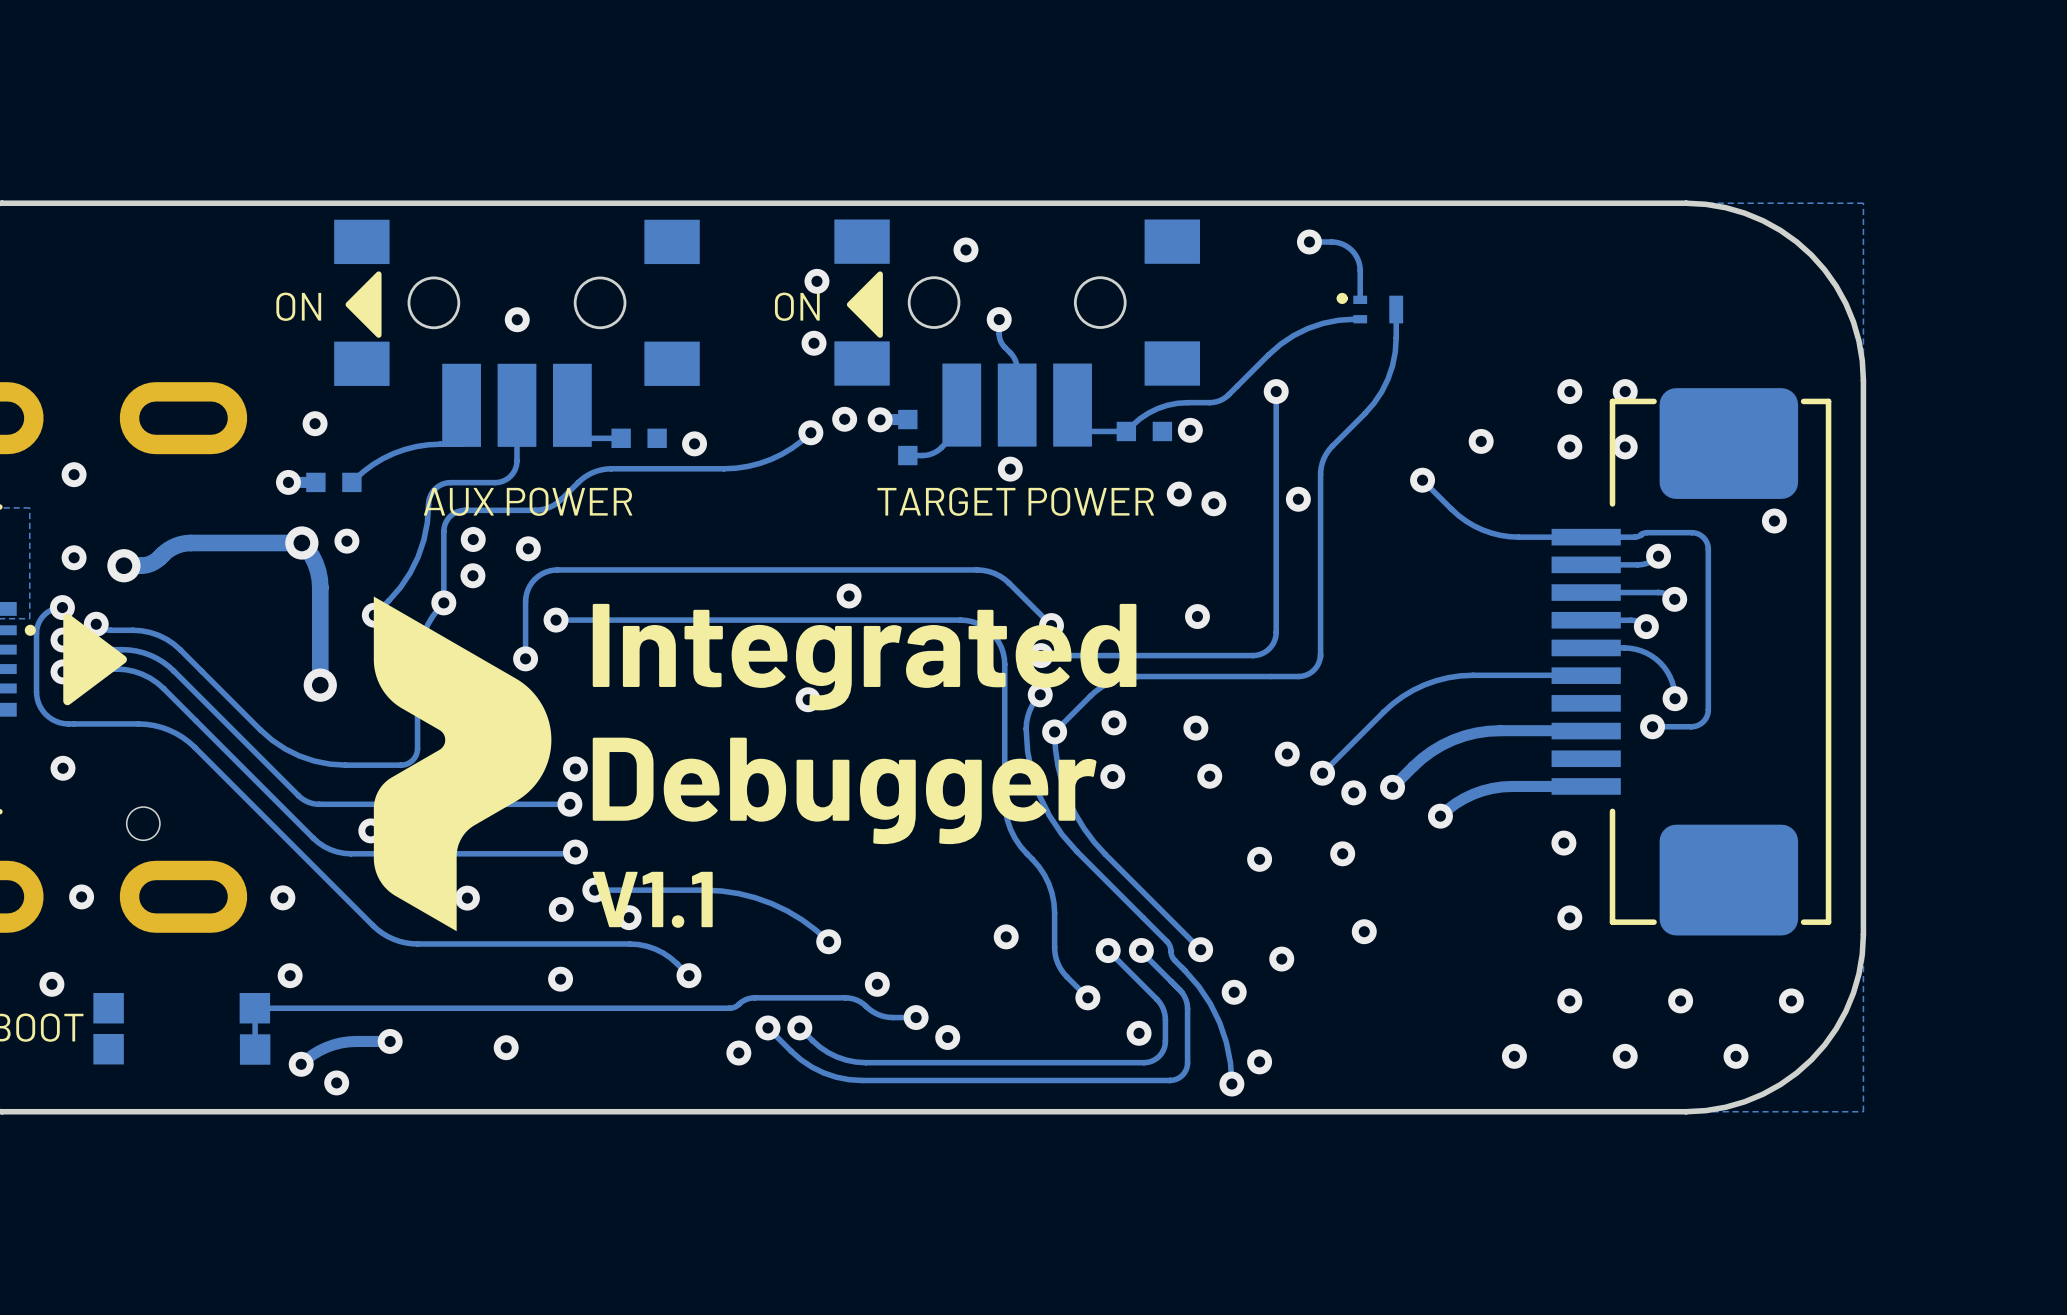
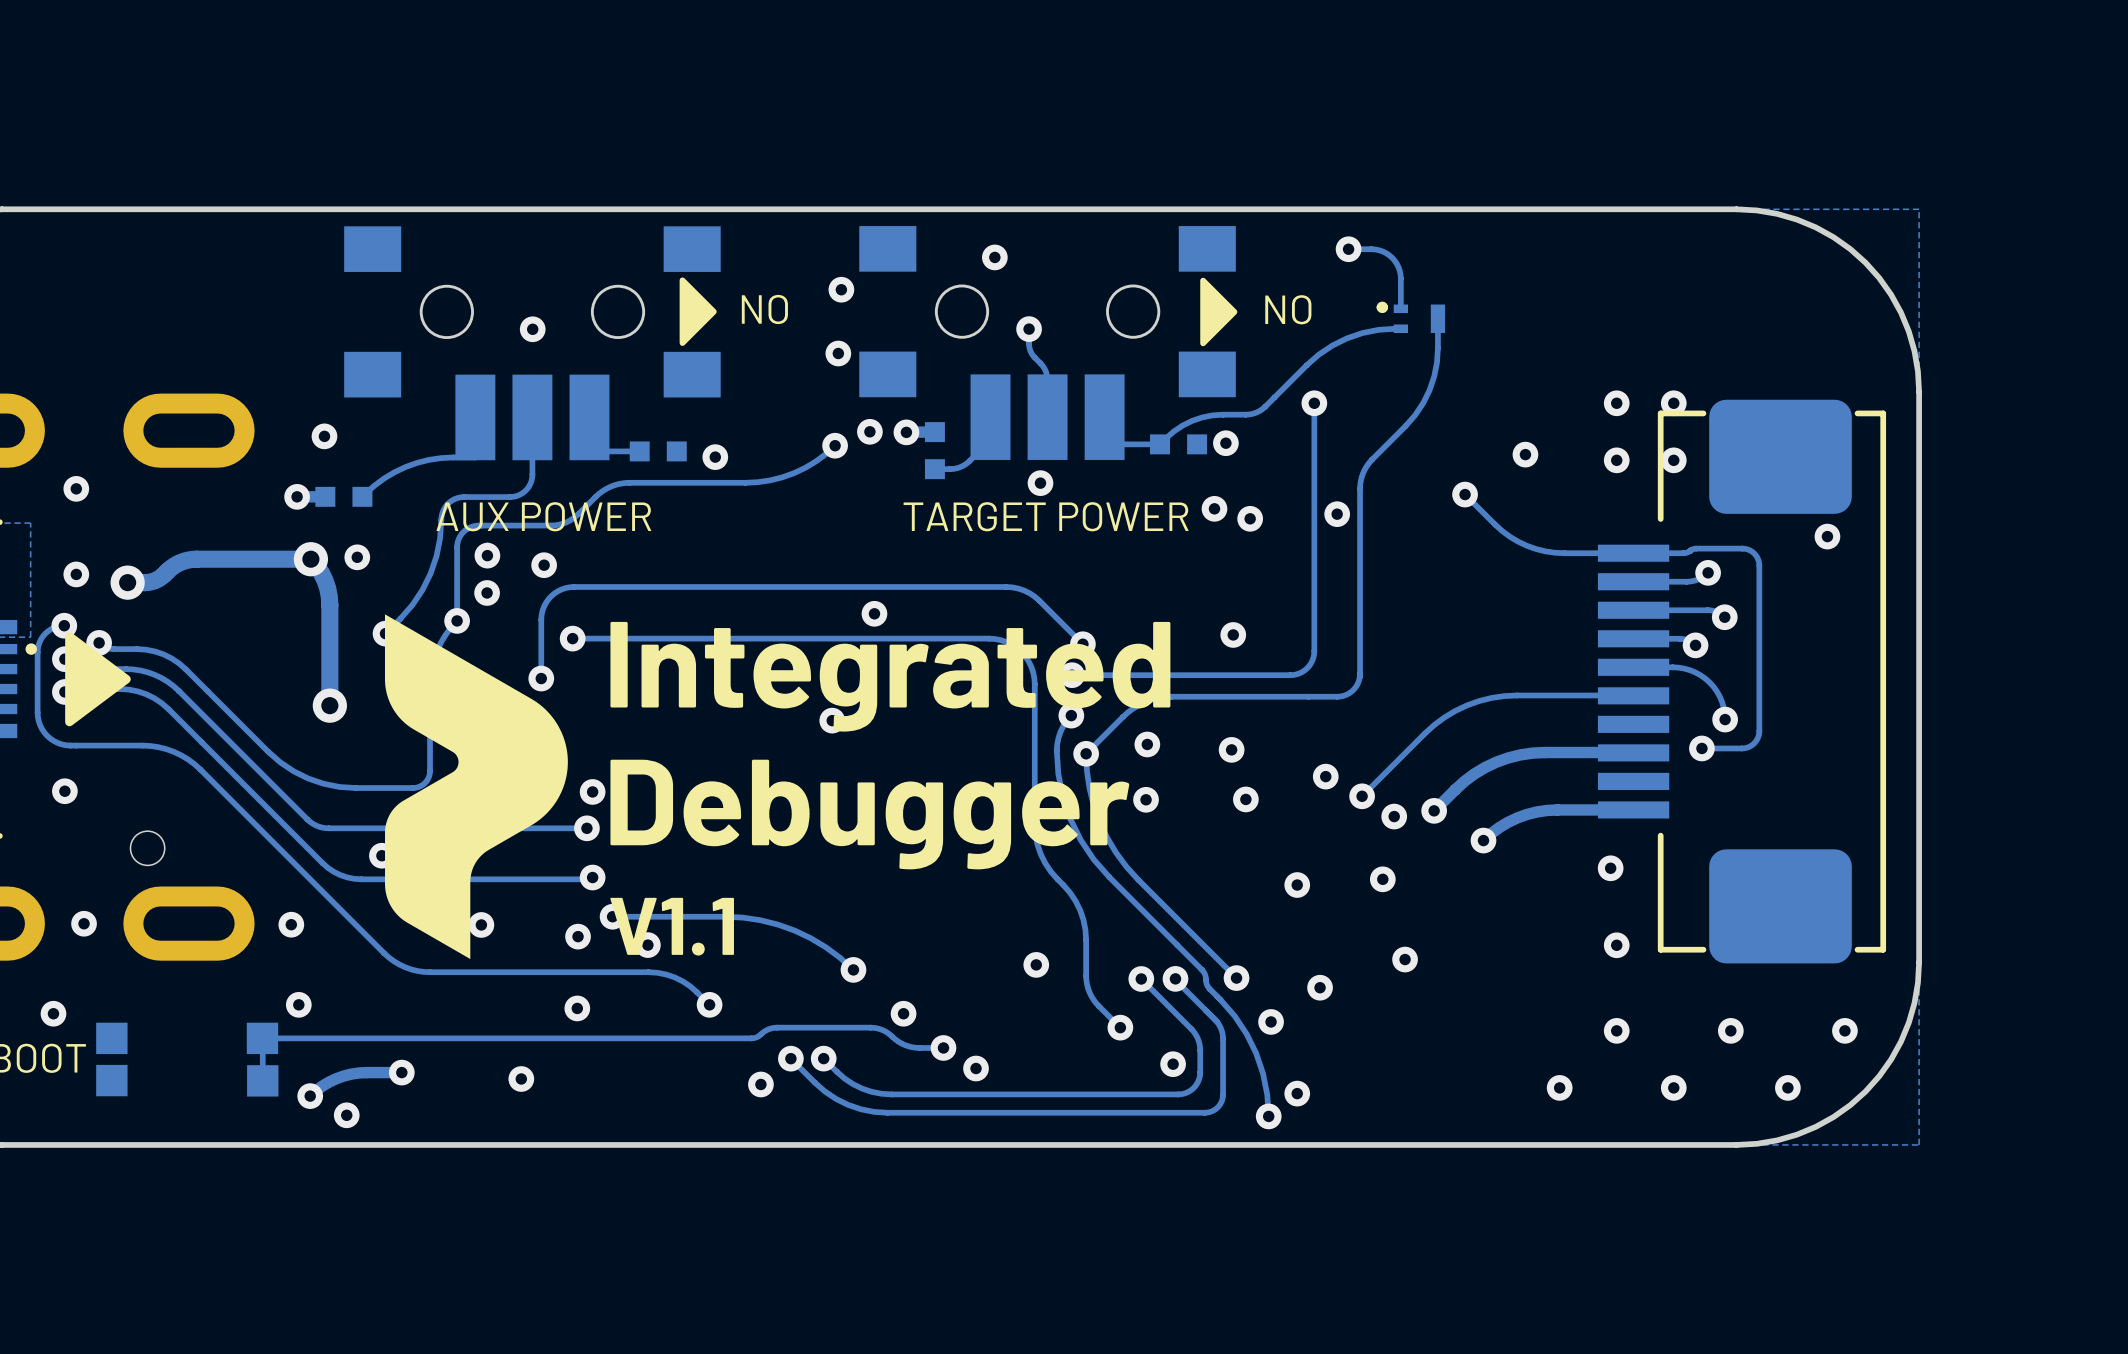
drawing: none -> [679, 277, 717, 346]
drawing: none -> [1200, 277, 1238, 347]
drawing: [345, 271, 382, 338] -> none
drawing: [846, 271, 883, 338] -> none
text rotation: 0° (298, 306) -> 180° (1288, 309)
text position: ON (298, 306) -> ON (1288, 309)
text rotation: 0° (797, 306) -> 180° (764, 309)
text position: ON (797, 306) -> ON (764, 309)

